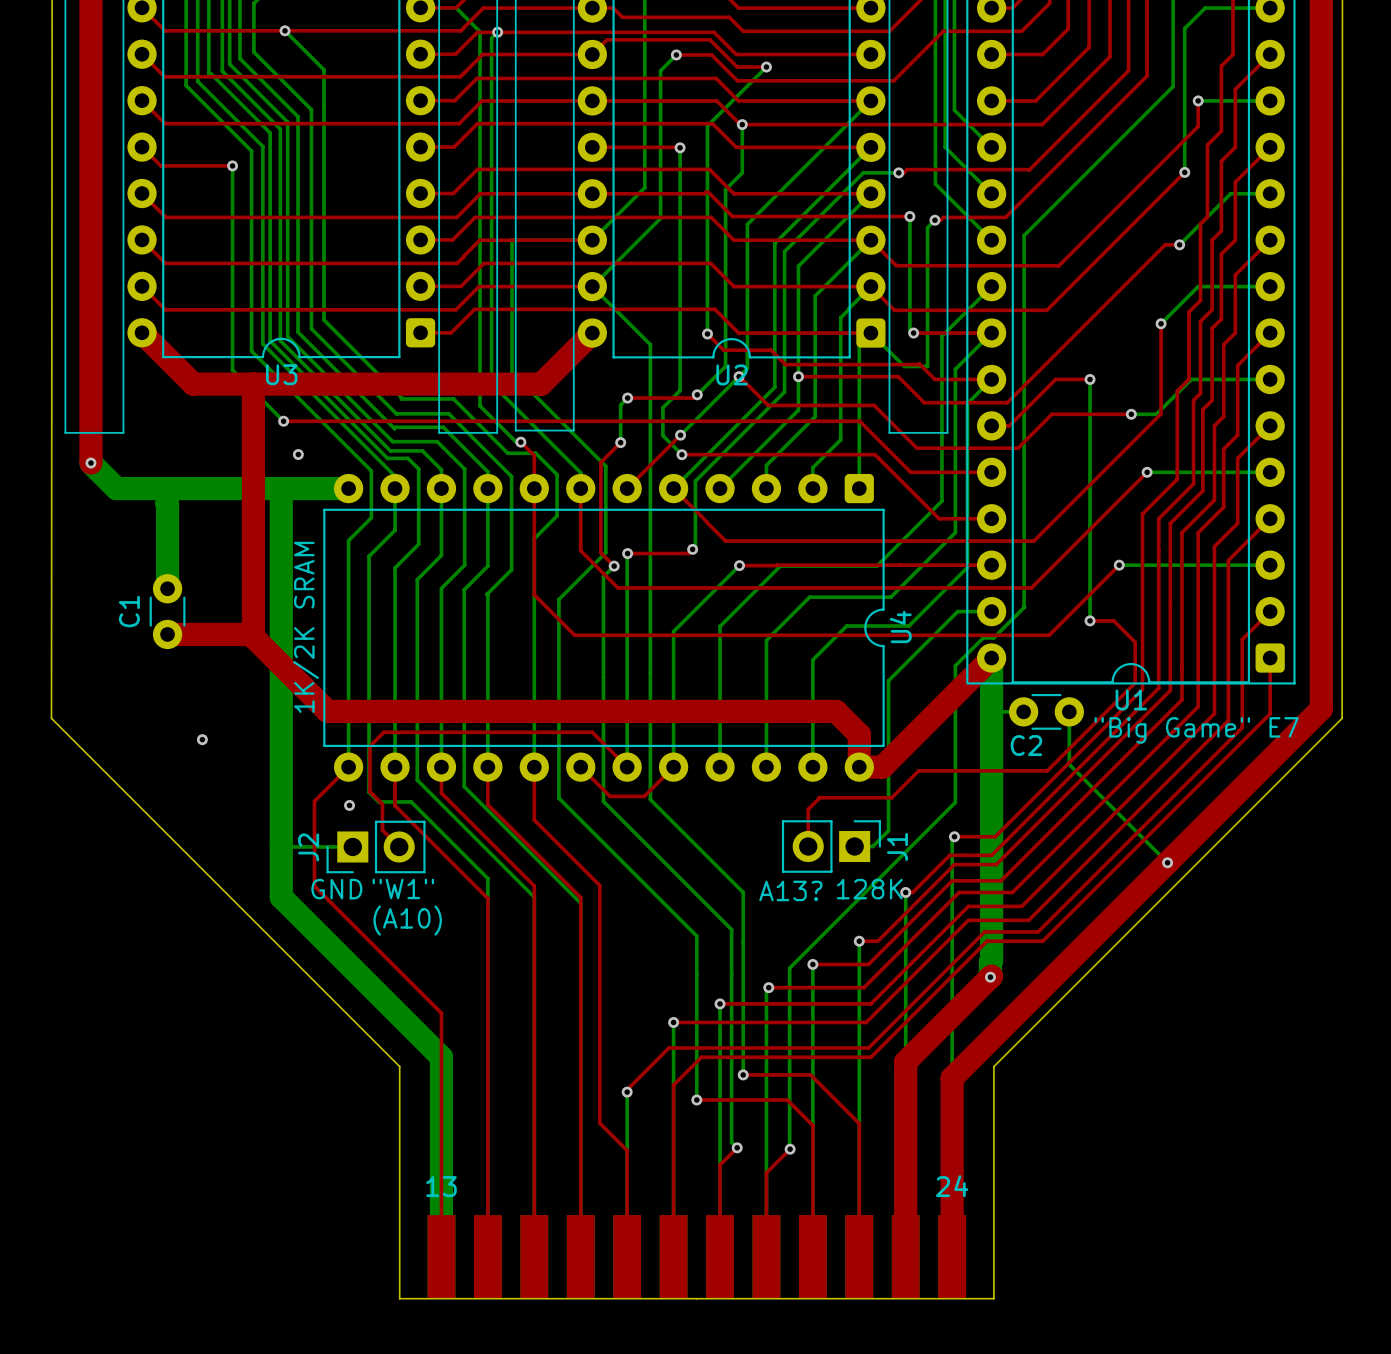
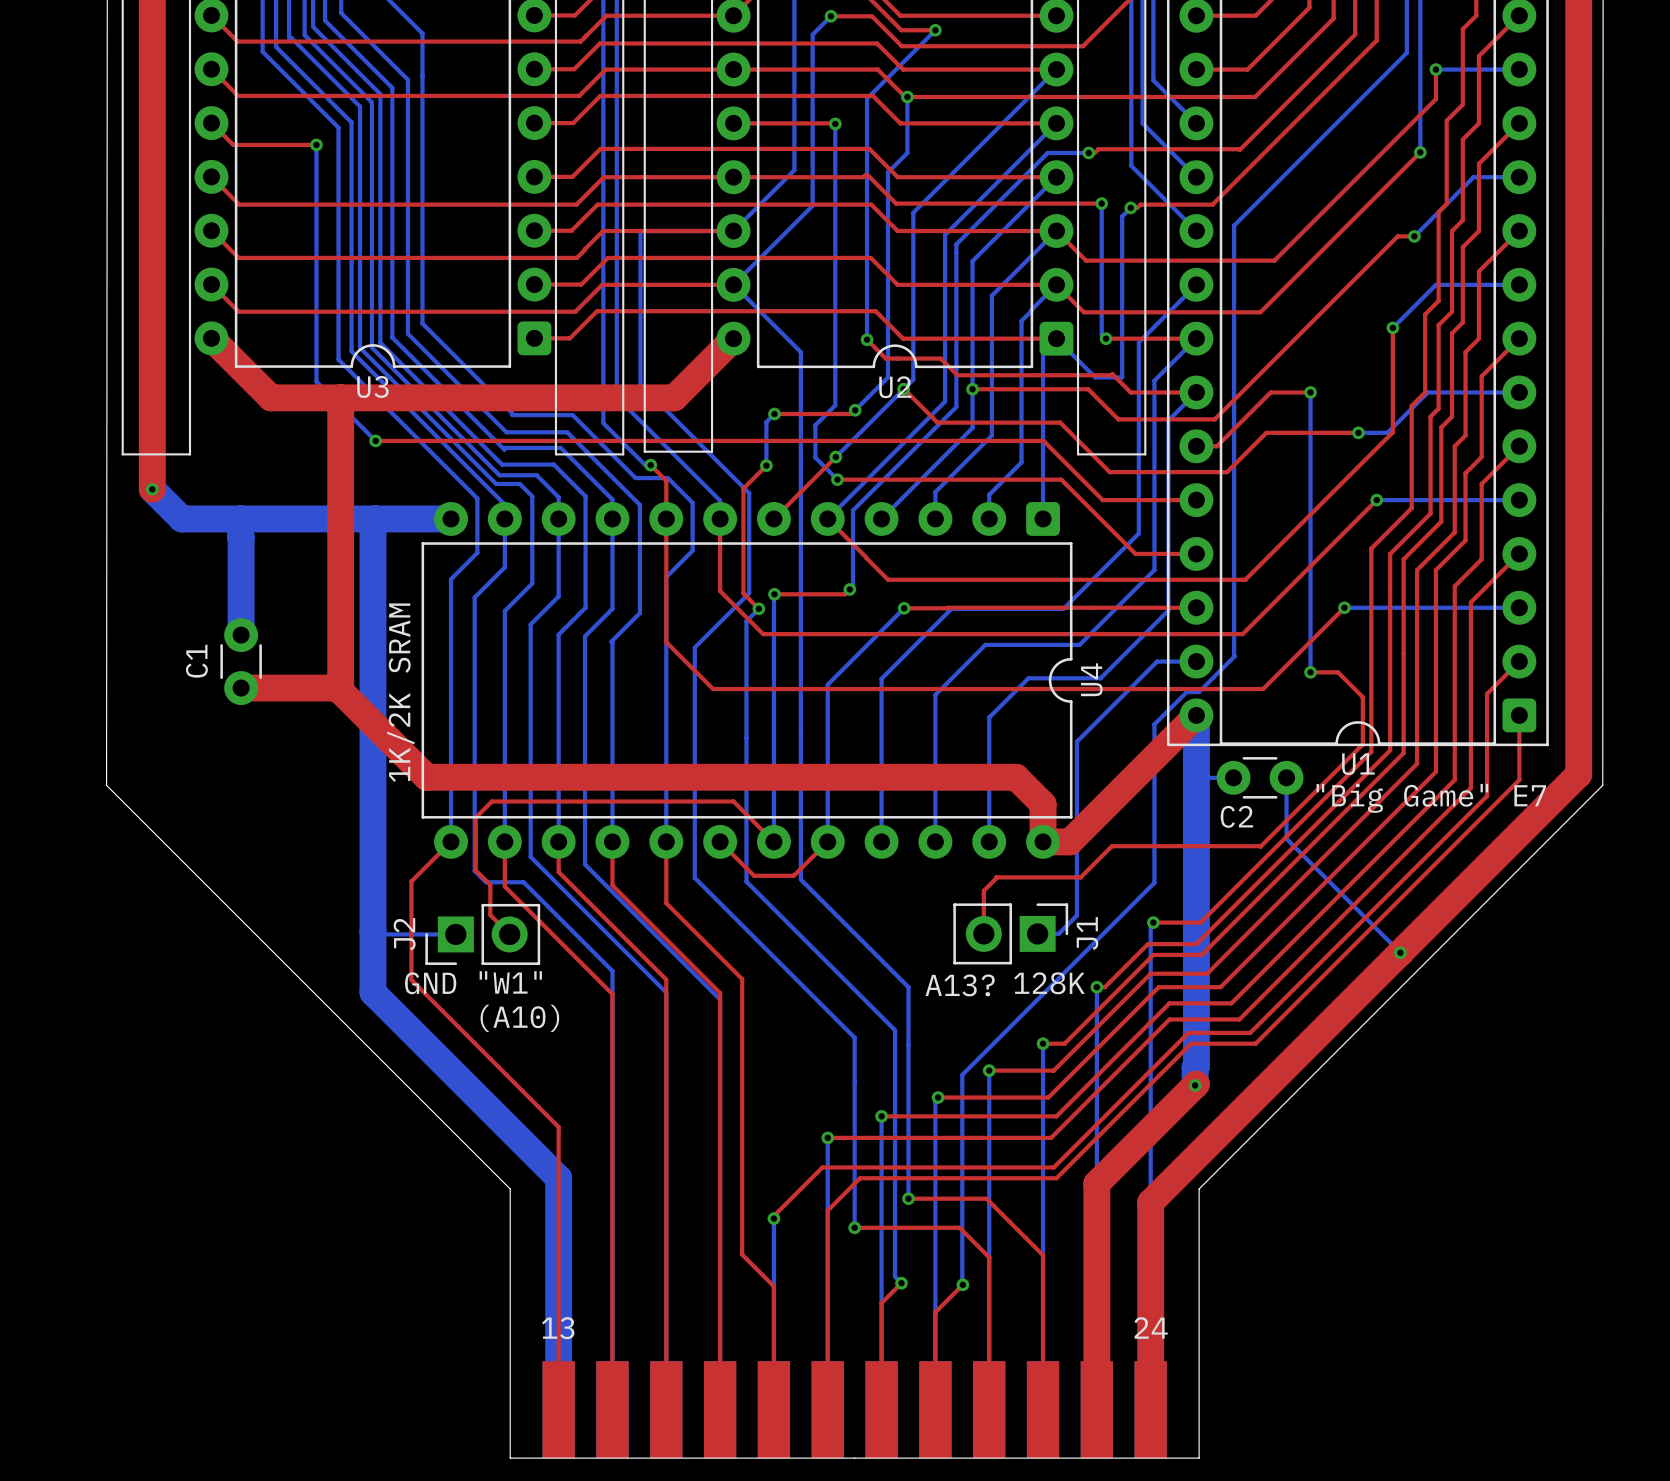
via: (298, 454) -> none
via: (202, 739) -> none
via: (349, 805) -> none

